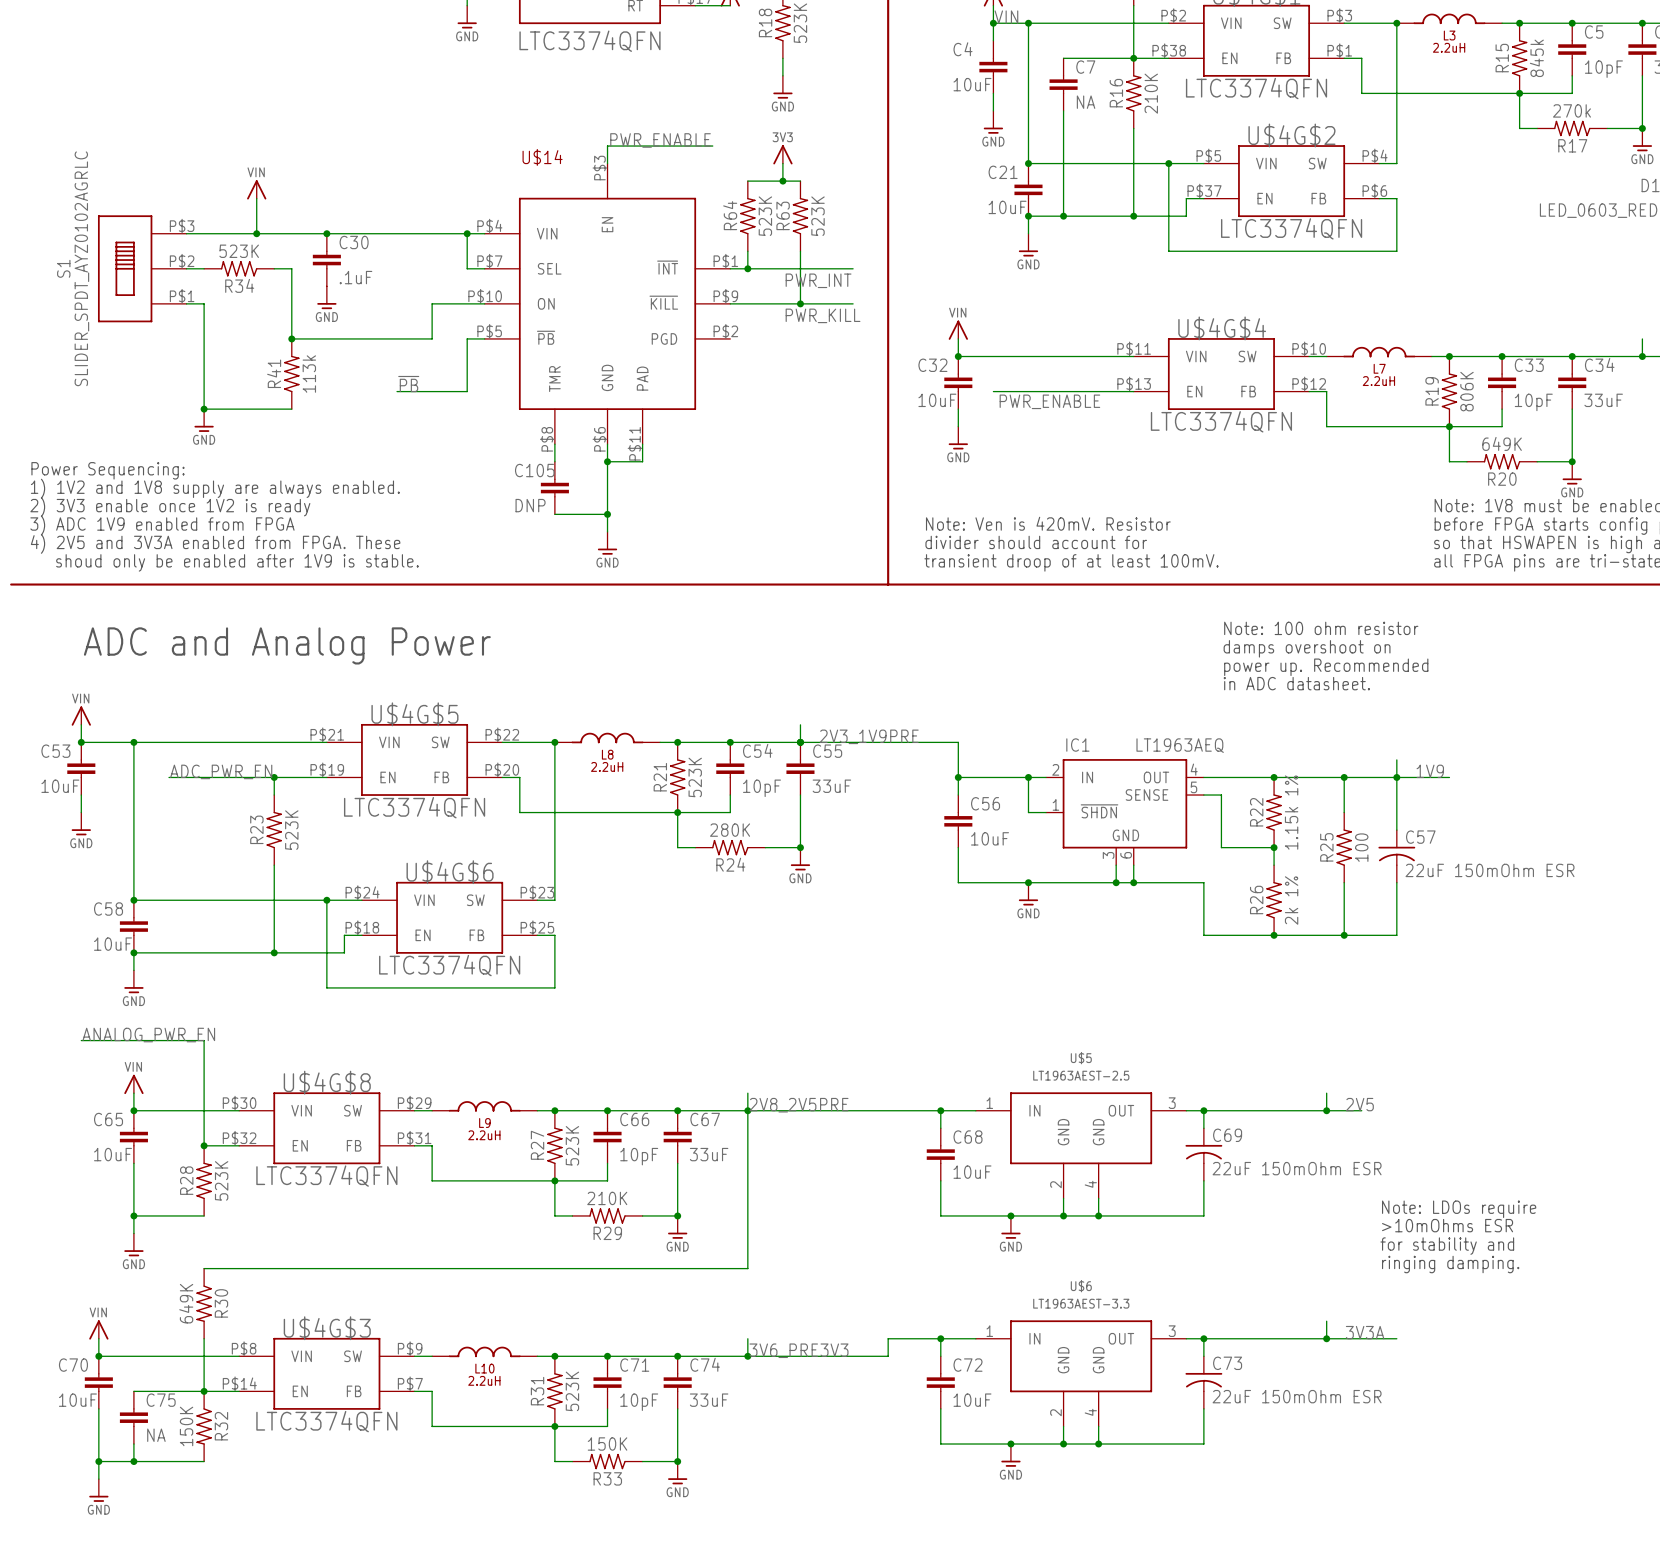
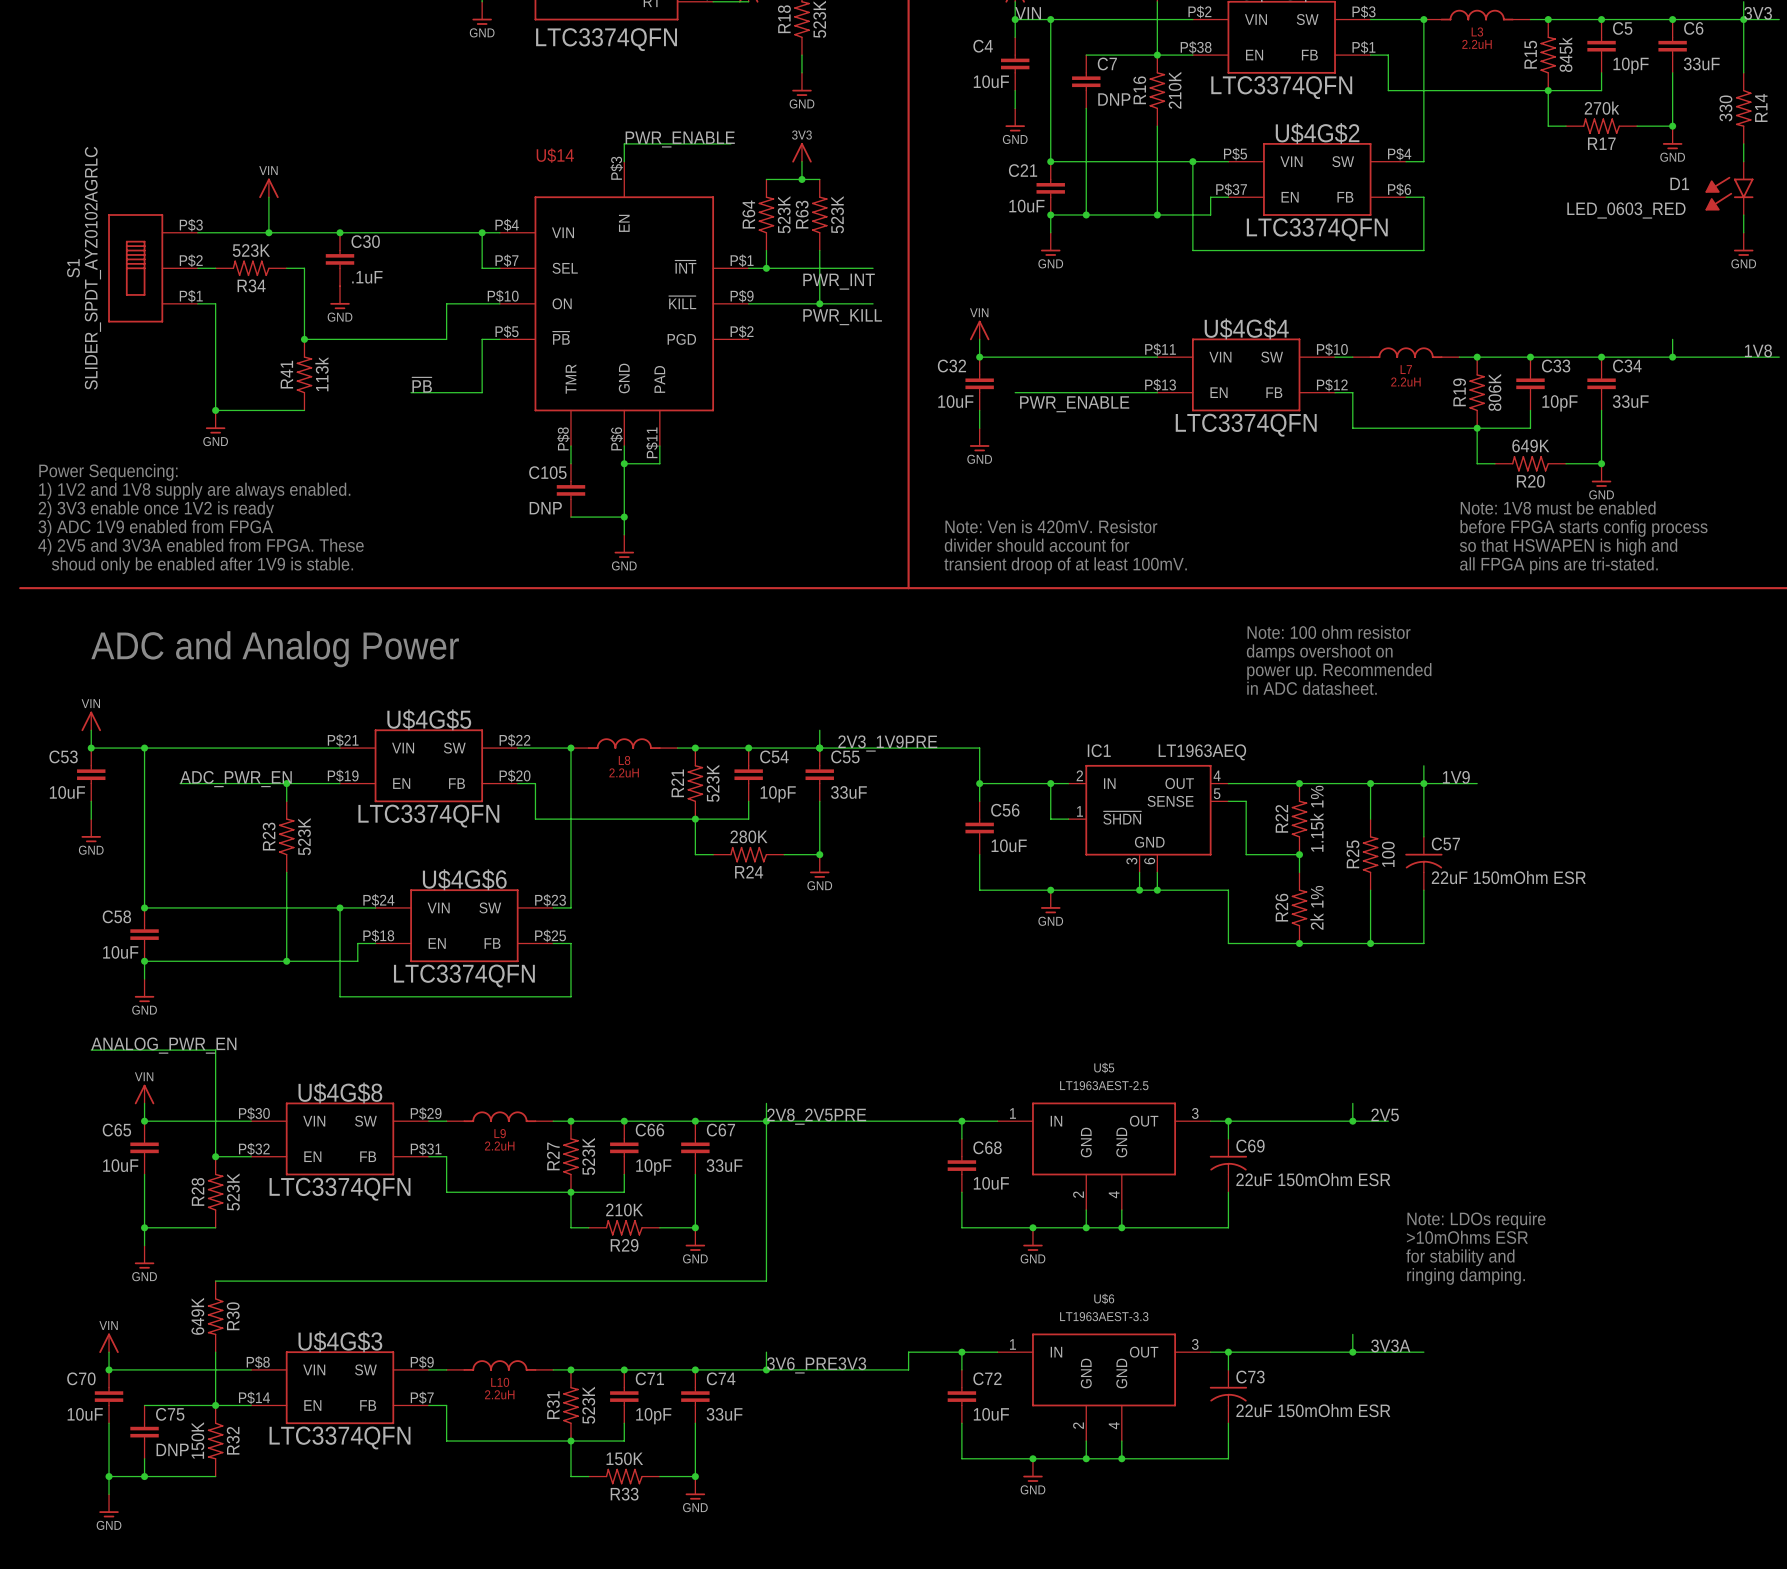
C7 value: NA (1086, 102) -> DNP (1114, 99)
C75 value: NA (156, 1435) -> DNP (172, 1449)

